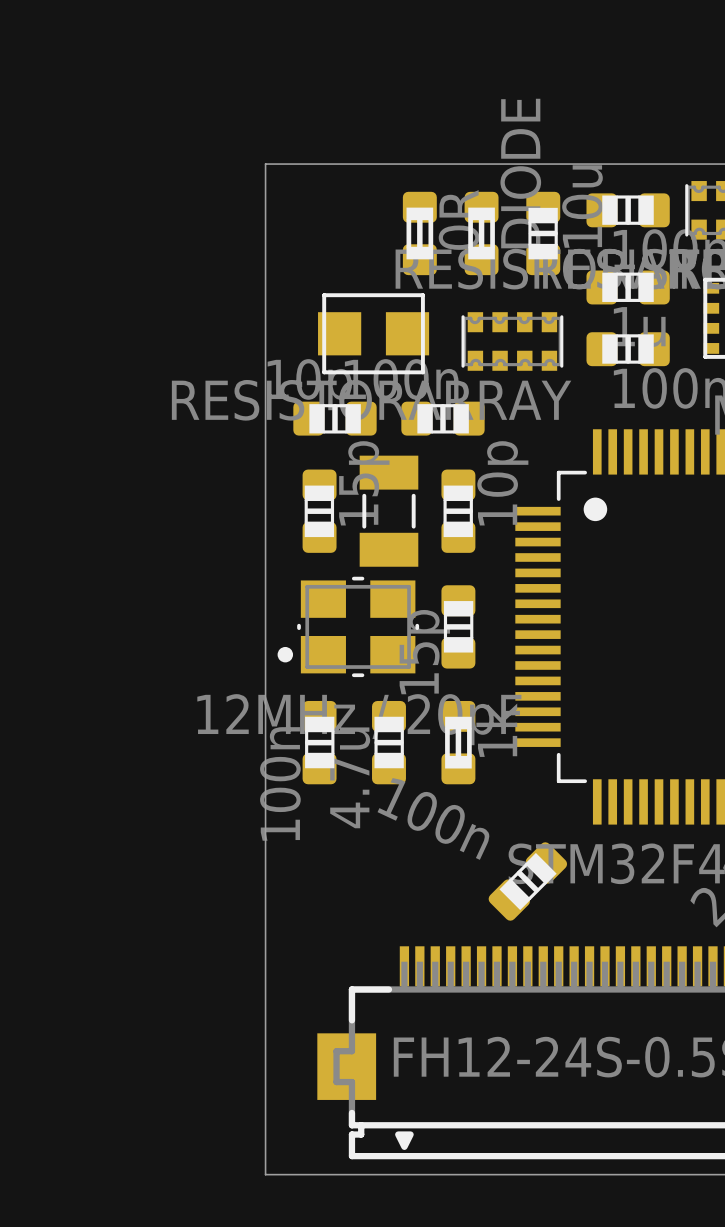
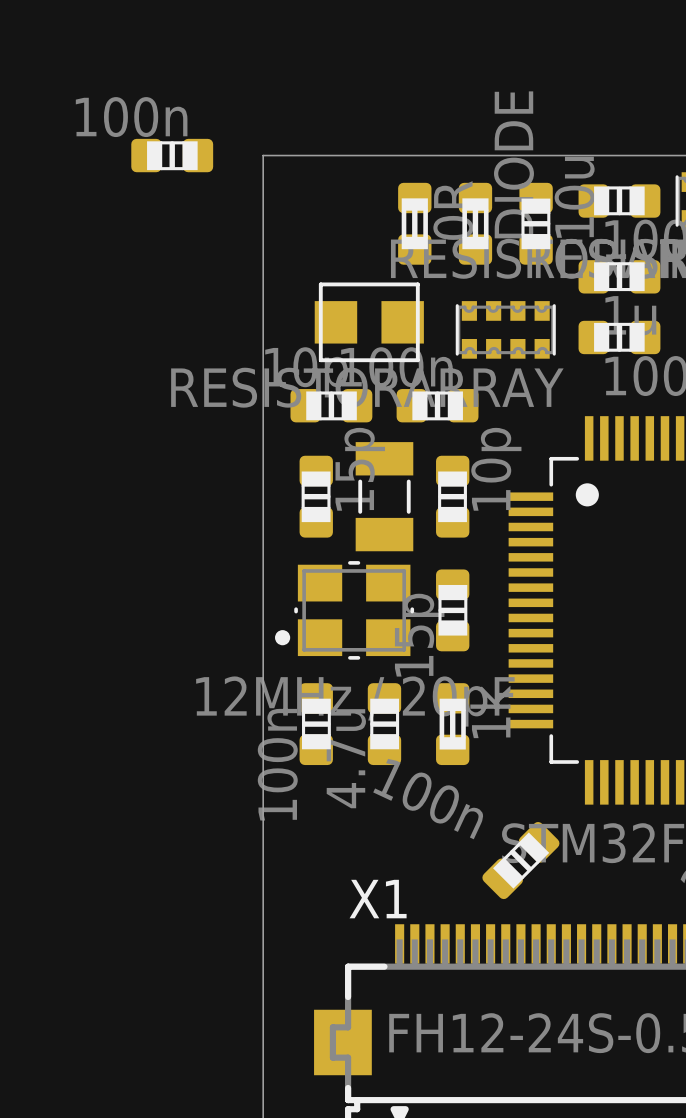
part: none -> 100n (172, 155)
X1 name: none -> X1 (378, 899)

